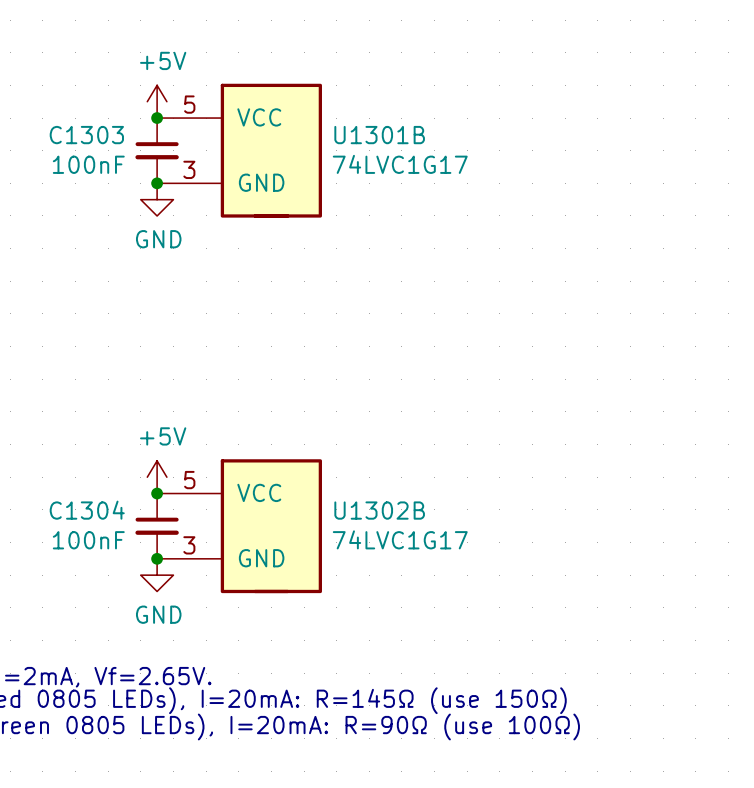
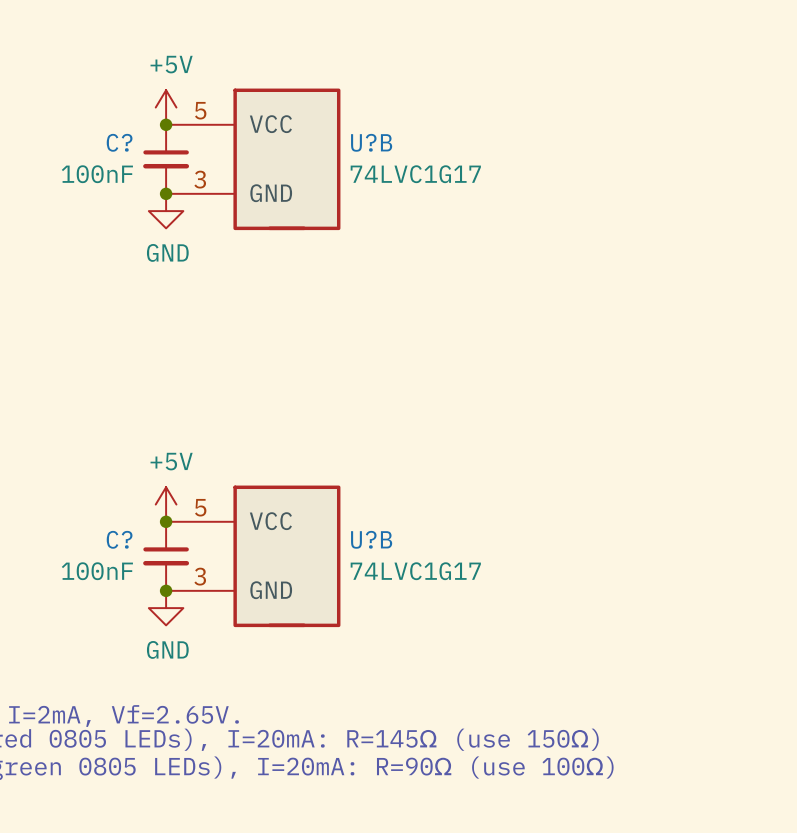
C1303 name: C1303 (86, 135) -> C? (119, 142)
U1301B name: U1301B (379, 135) -> U?B (371, 142)
C1304 name: C1304 (87, 510) -> C? (119, 539)
U1302B name: U1302B (379, 510) -> U?B (371, 539)

